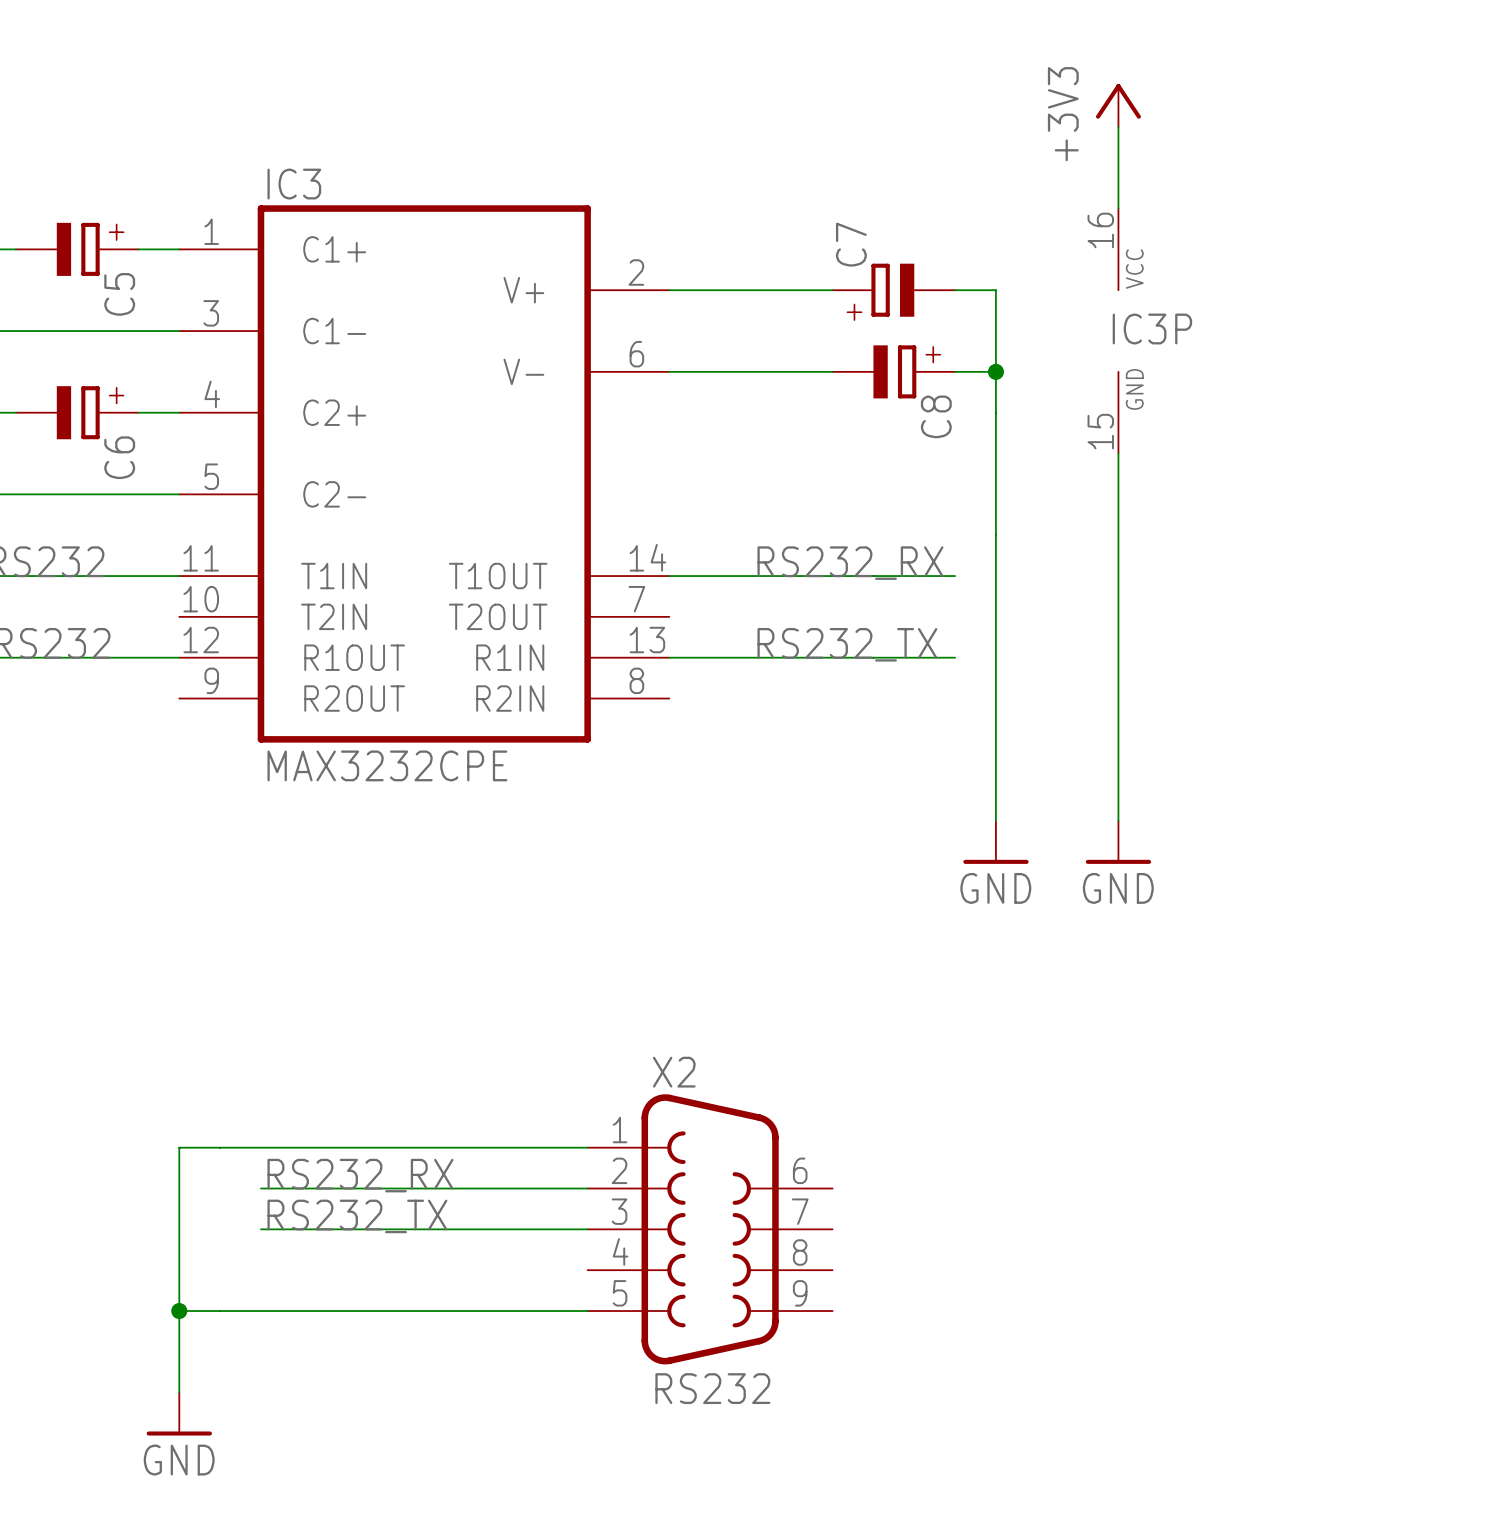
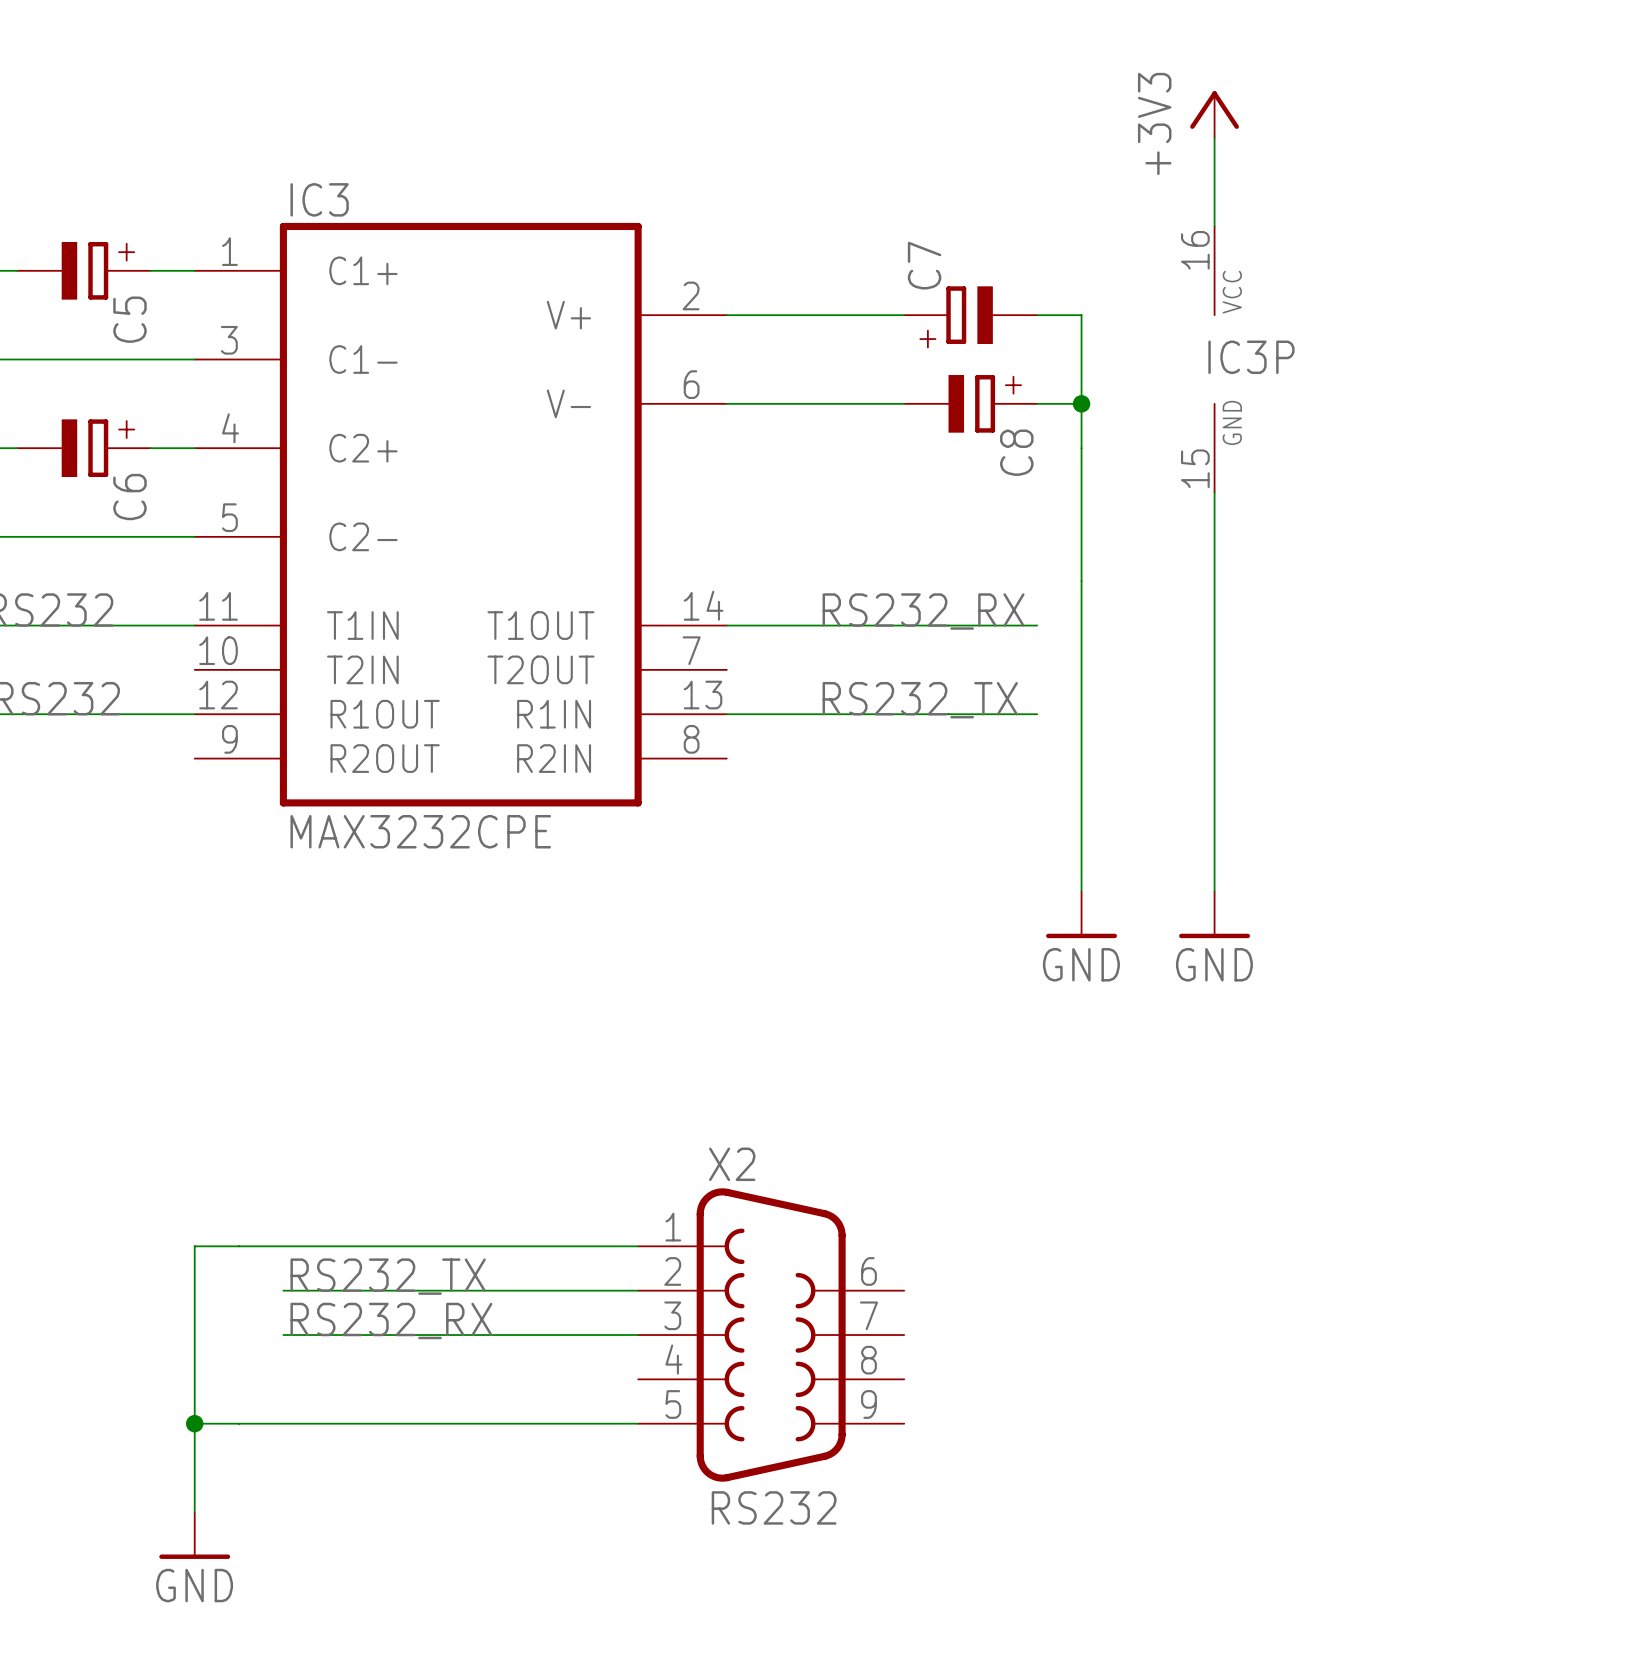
label: RS232_RX (360, 1175) -> RS232_TX (388, 1276)
label: RS232_TX (357, 1216) -> RS232_RX (391, 1320)

